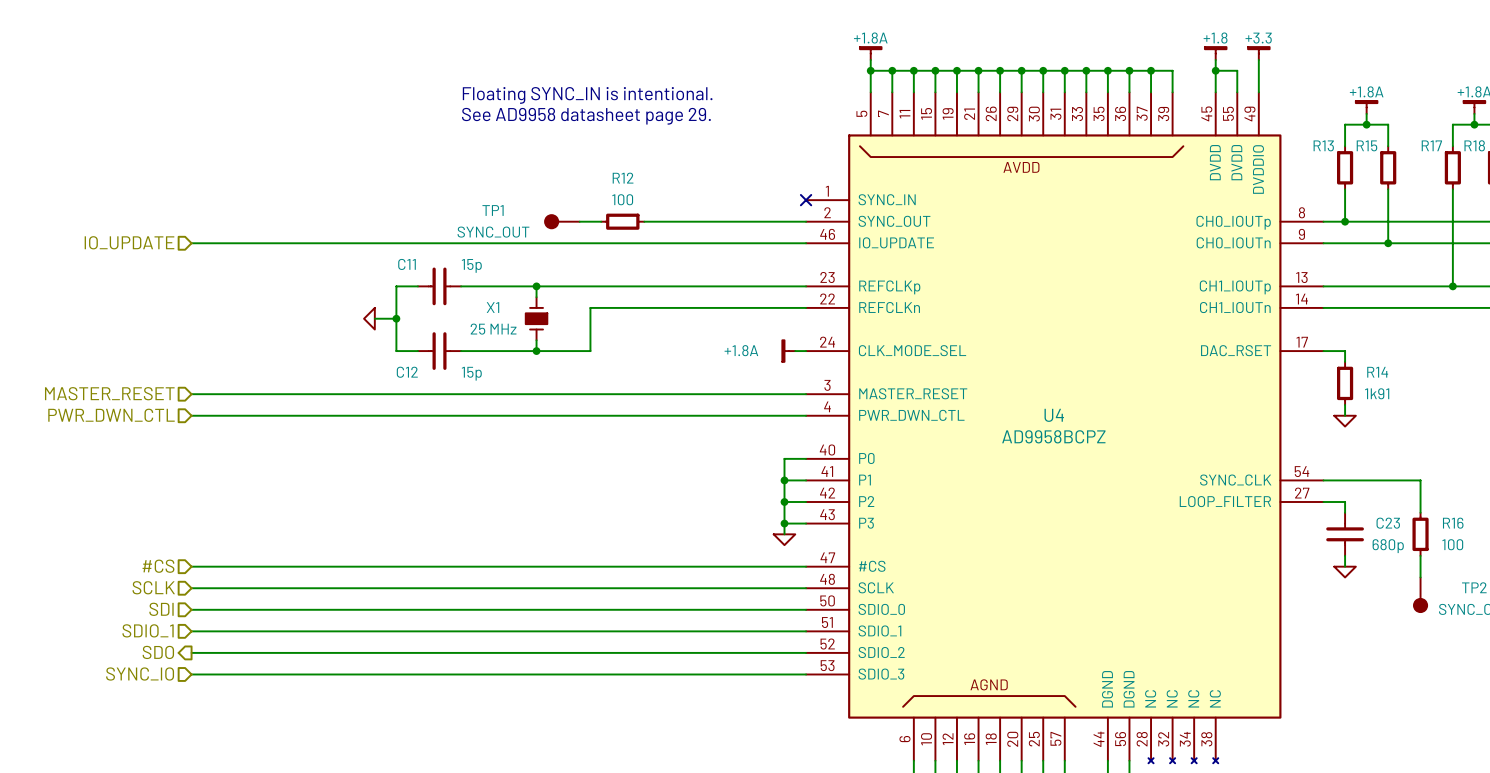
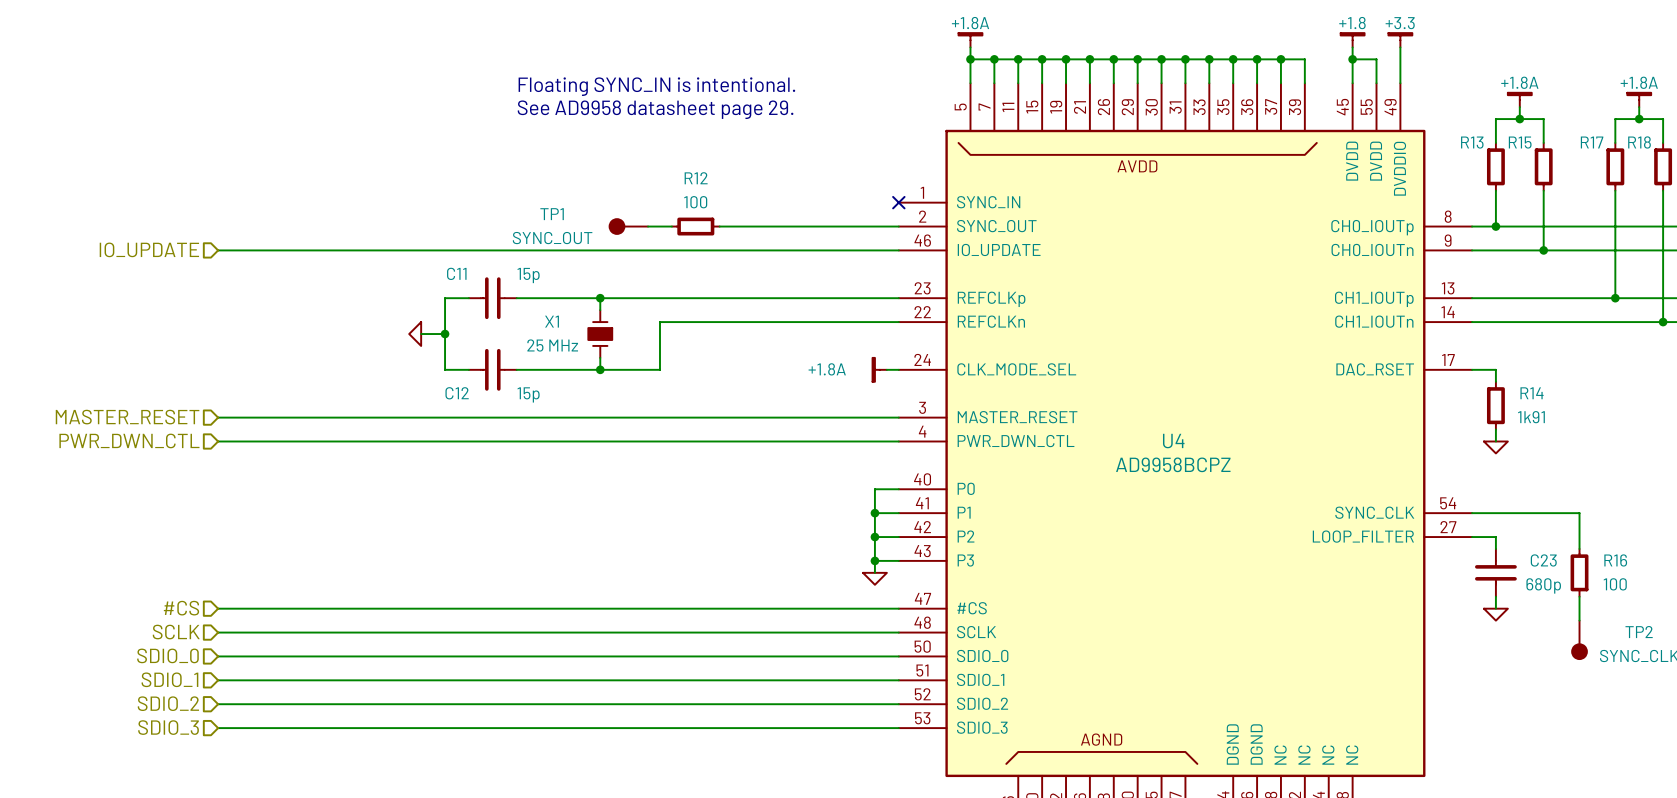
hierarchical label: SDI (161, 609) -> SDIO_0 (167, 655)
hierarchical label shape: output (158, 652) -> input (168, 703)
hierarchical label: SDO (158, 652) -> SDIO_2 (168, 703)
hierarchical label: SYNC_IO (140, 674) -> SDIO_3 (168, 727)

